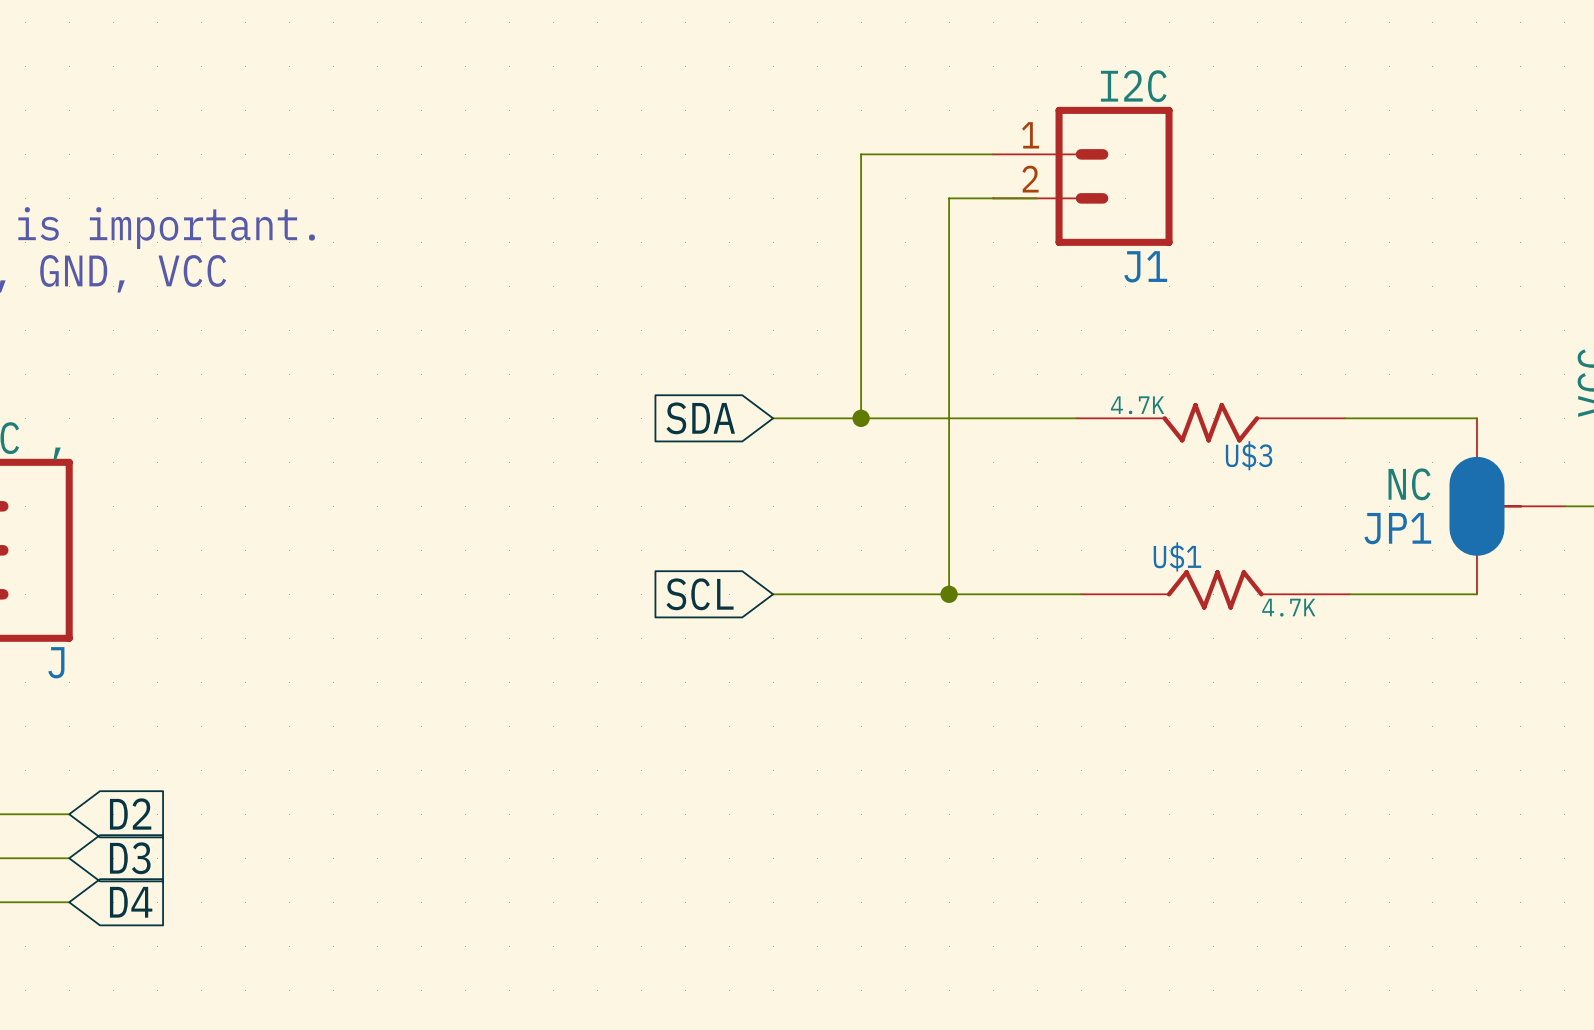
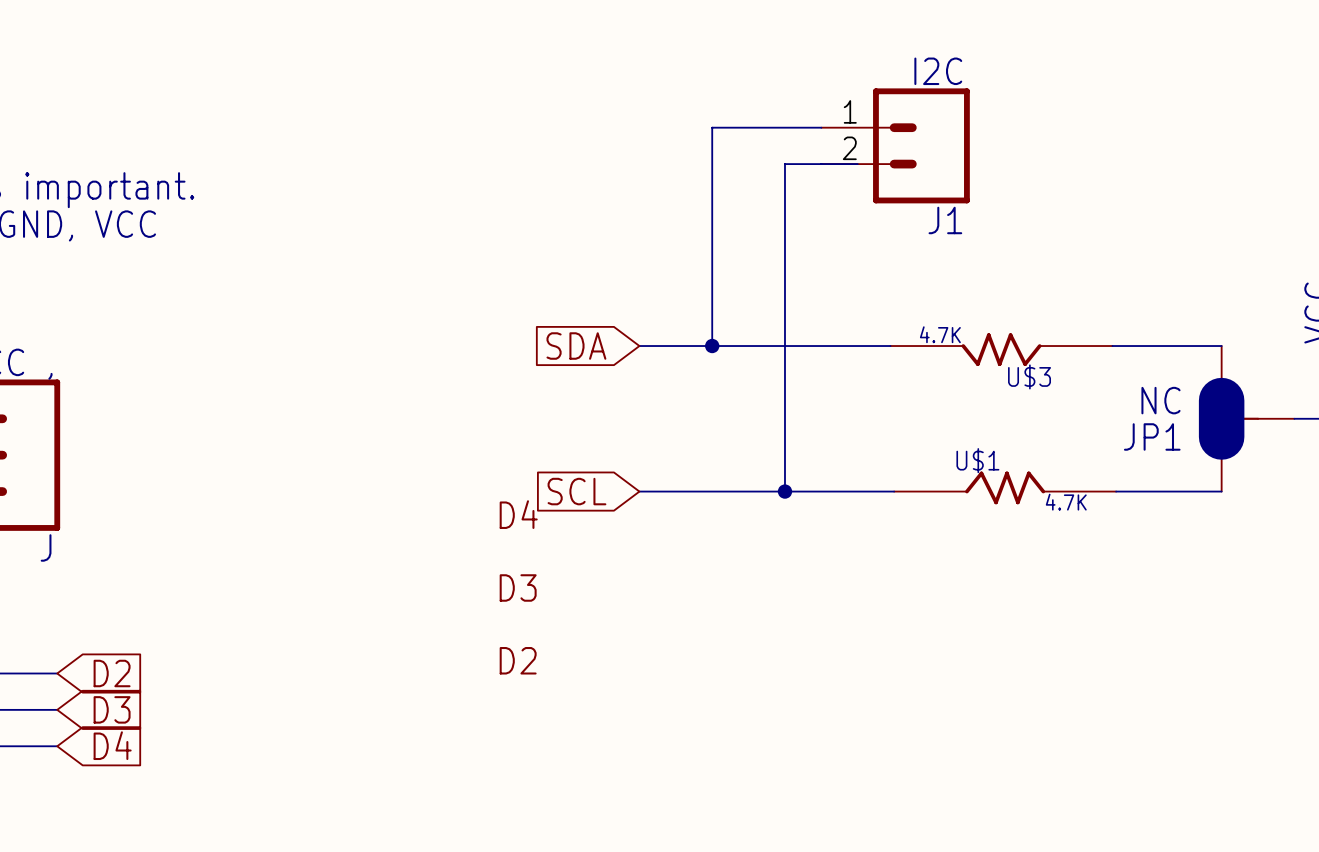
label: none -> D4 (518, 514)
label: none -> D3 (518, 587)
label: none -> D2 (518, 660)

